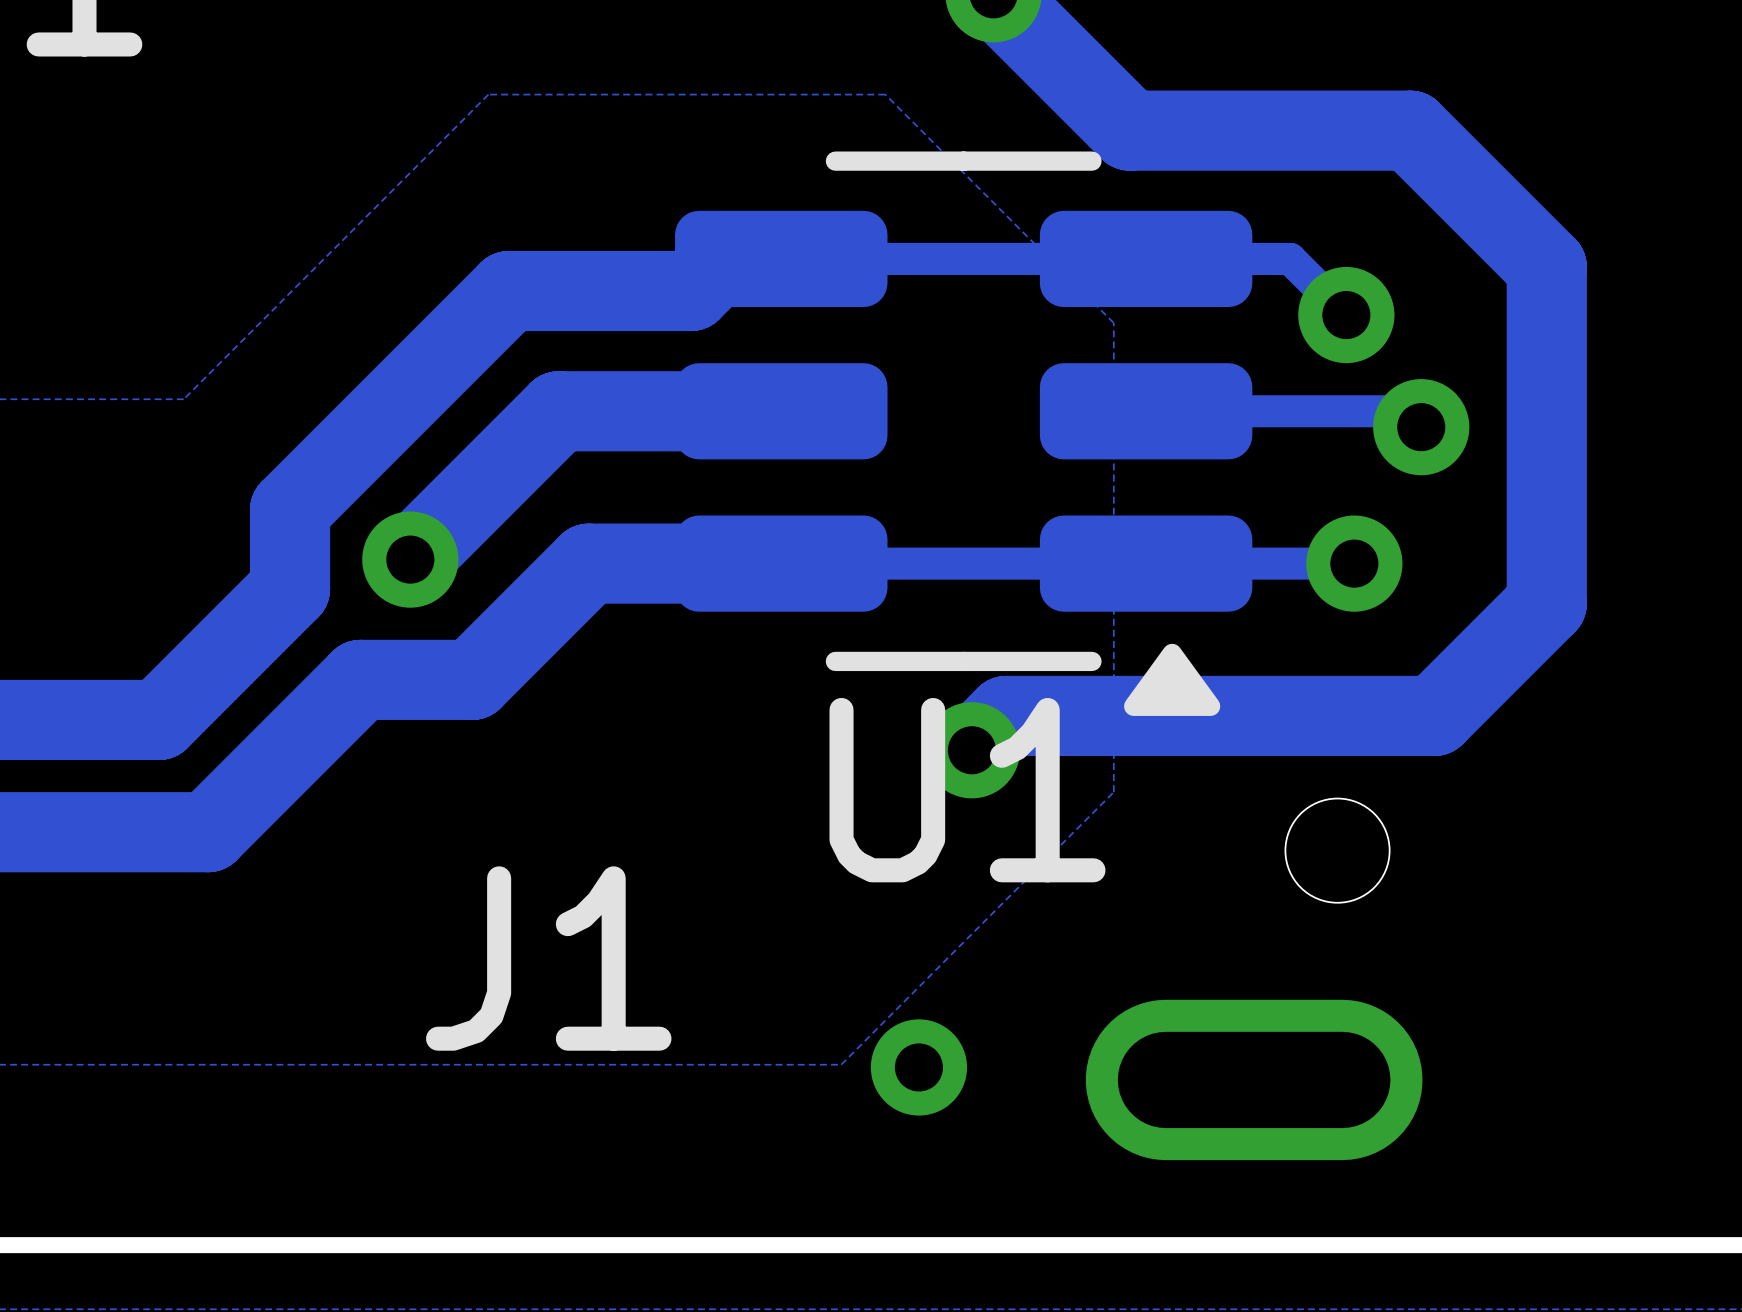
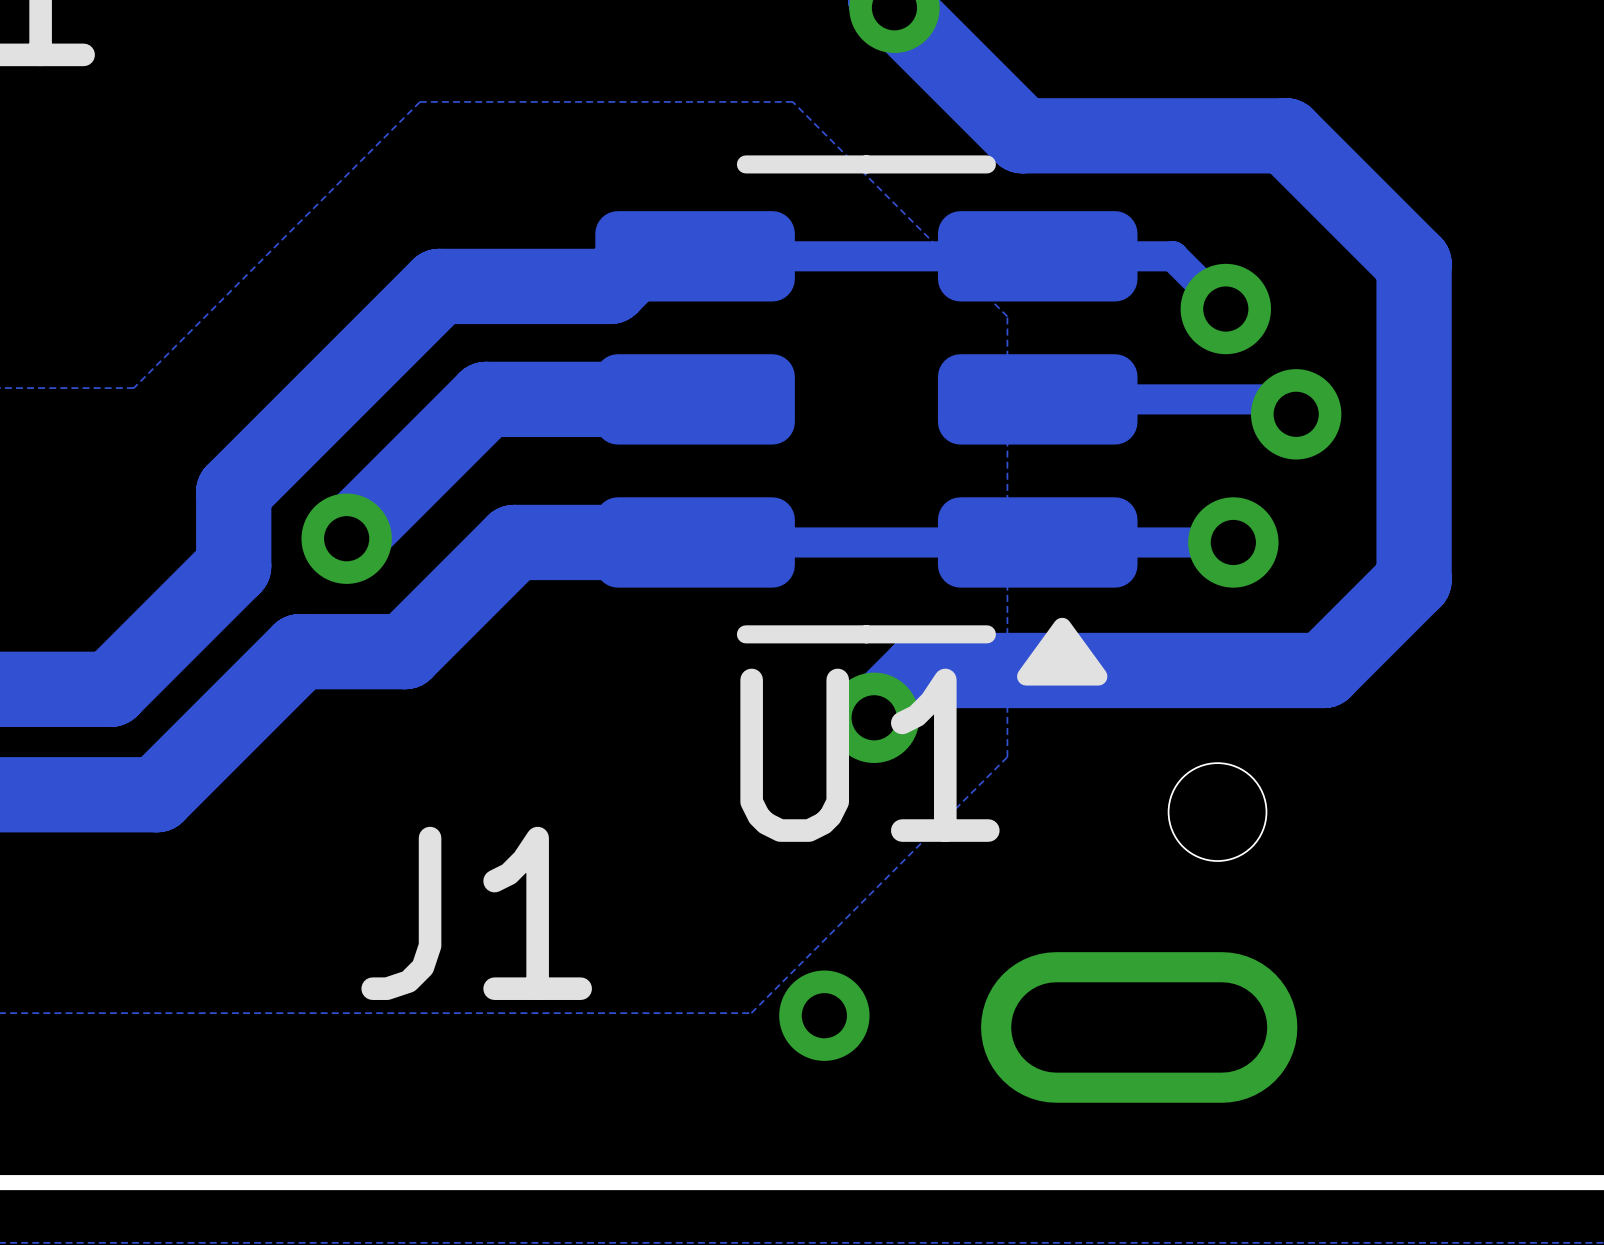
track: (1450, 699) (1434, 715) (1006, 715) -> (1323, 670) (921, 670) (906, 685)

